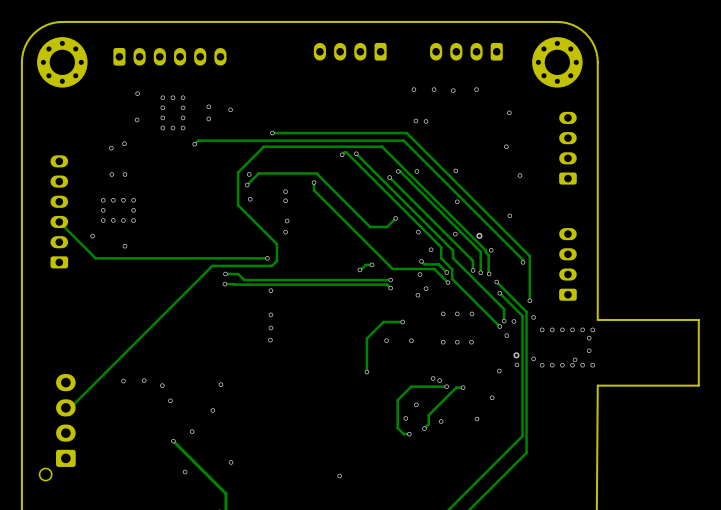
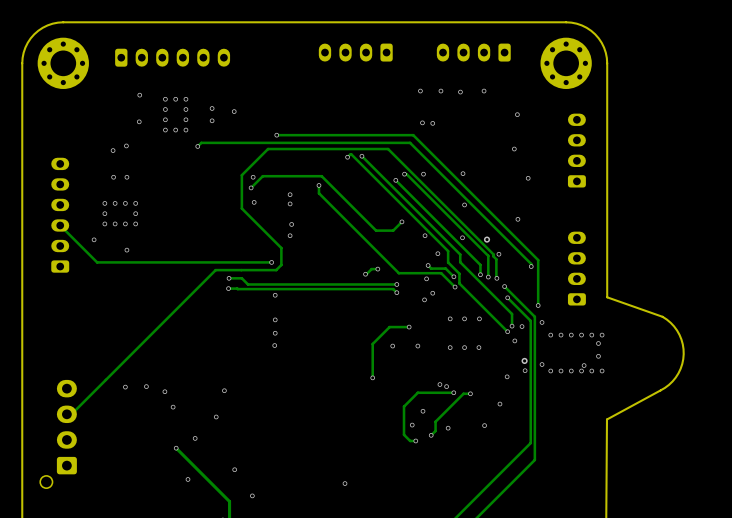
board edge: (597, 292) (597, 319) (698, 319) (698, 385) (597, 385) (597, 412) -> (607, 297) (666, 319) (679, 334) (683, 354) (680, 368) (669, 384) (607, 419)
via: none -> (252, 495)

